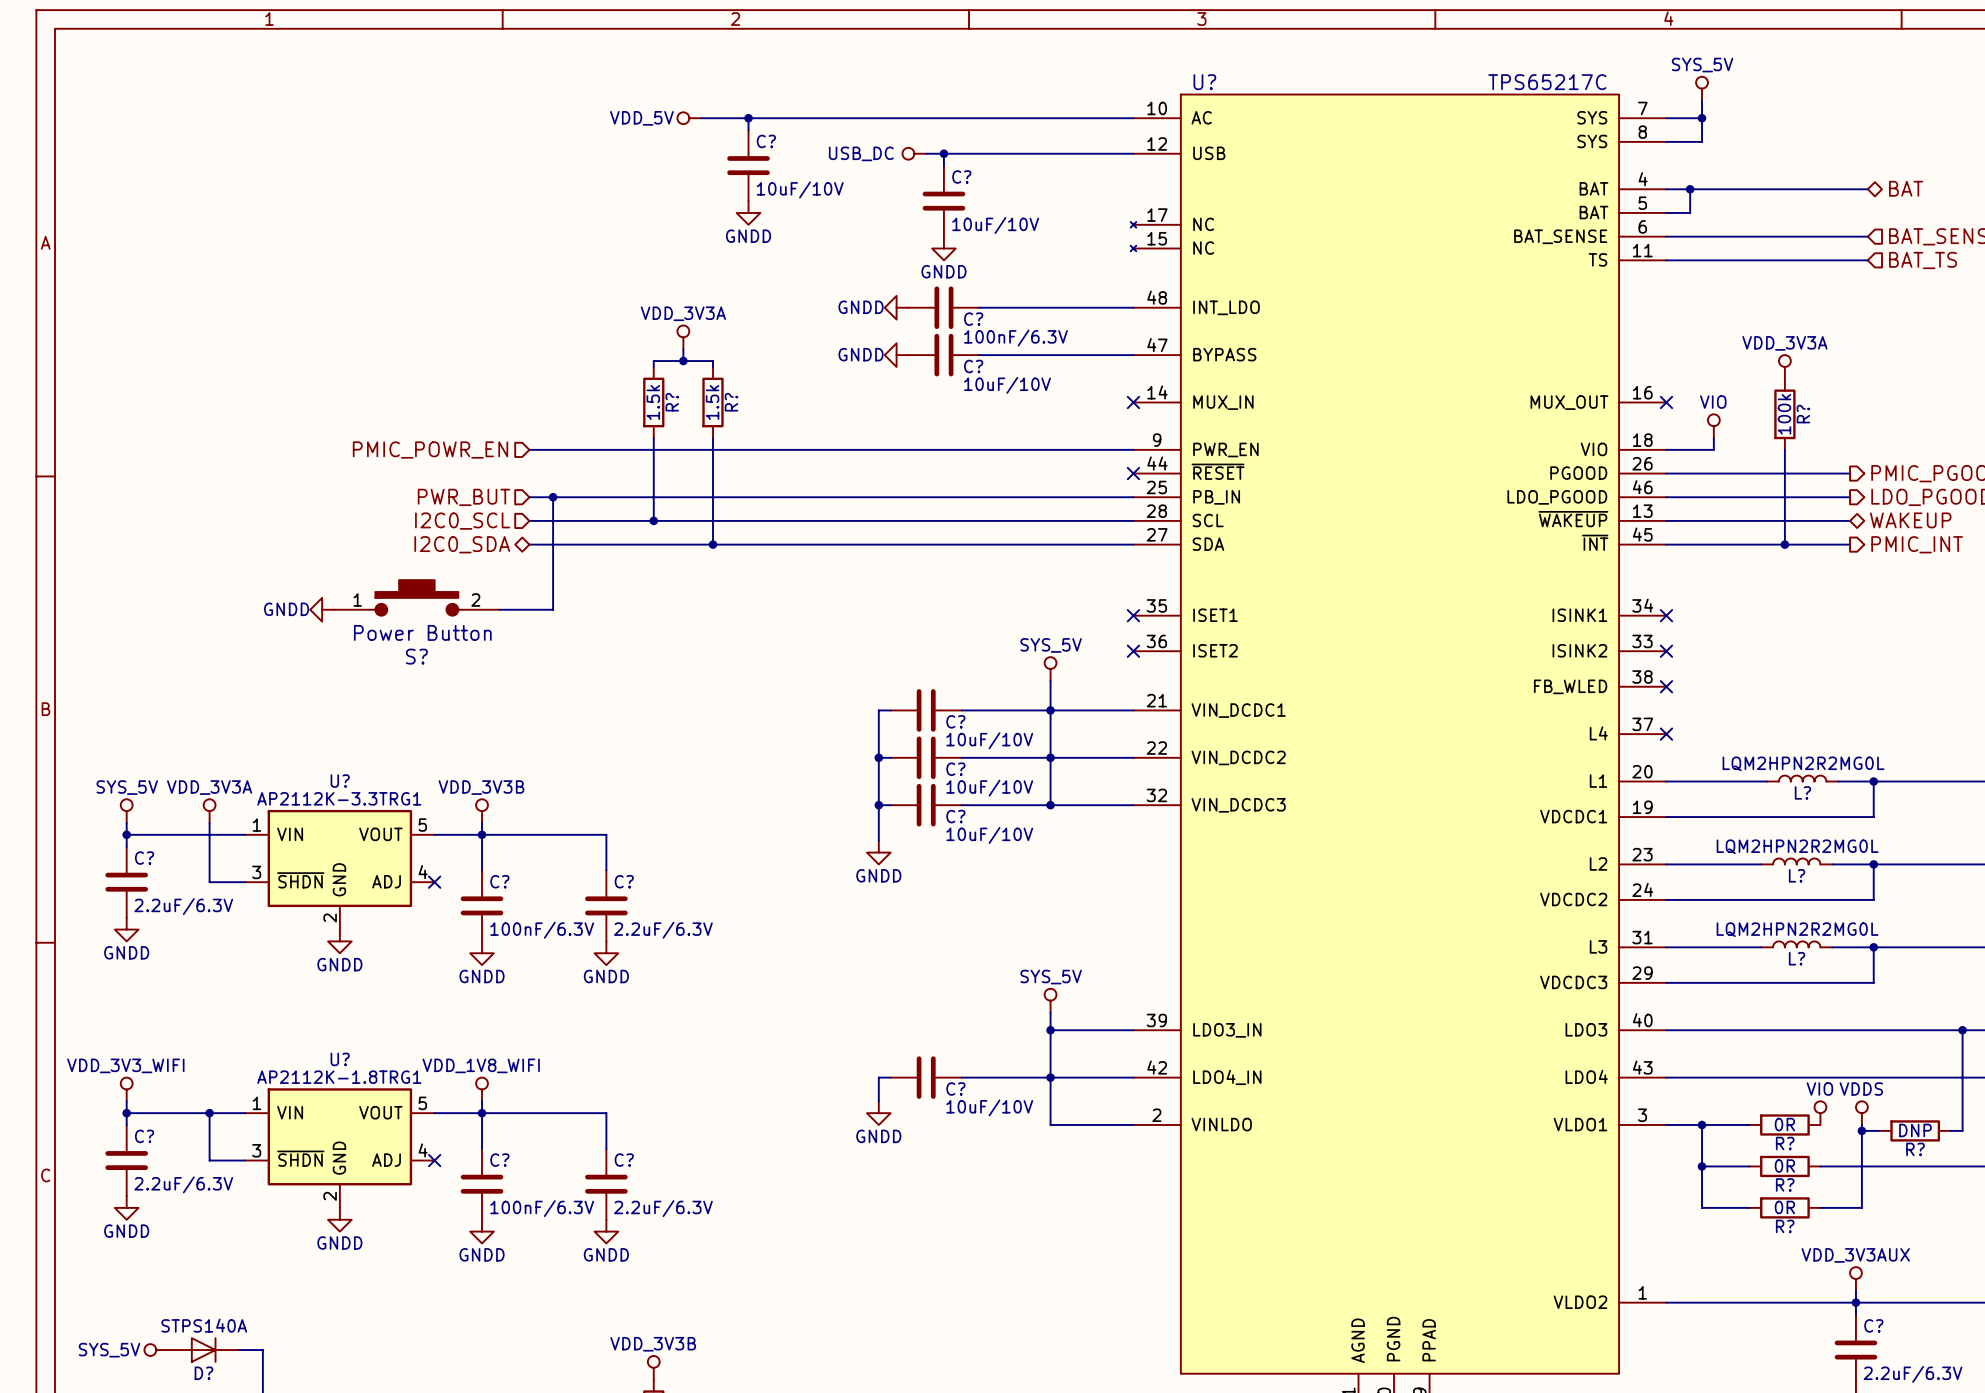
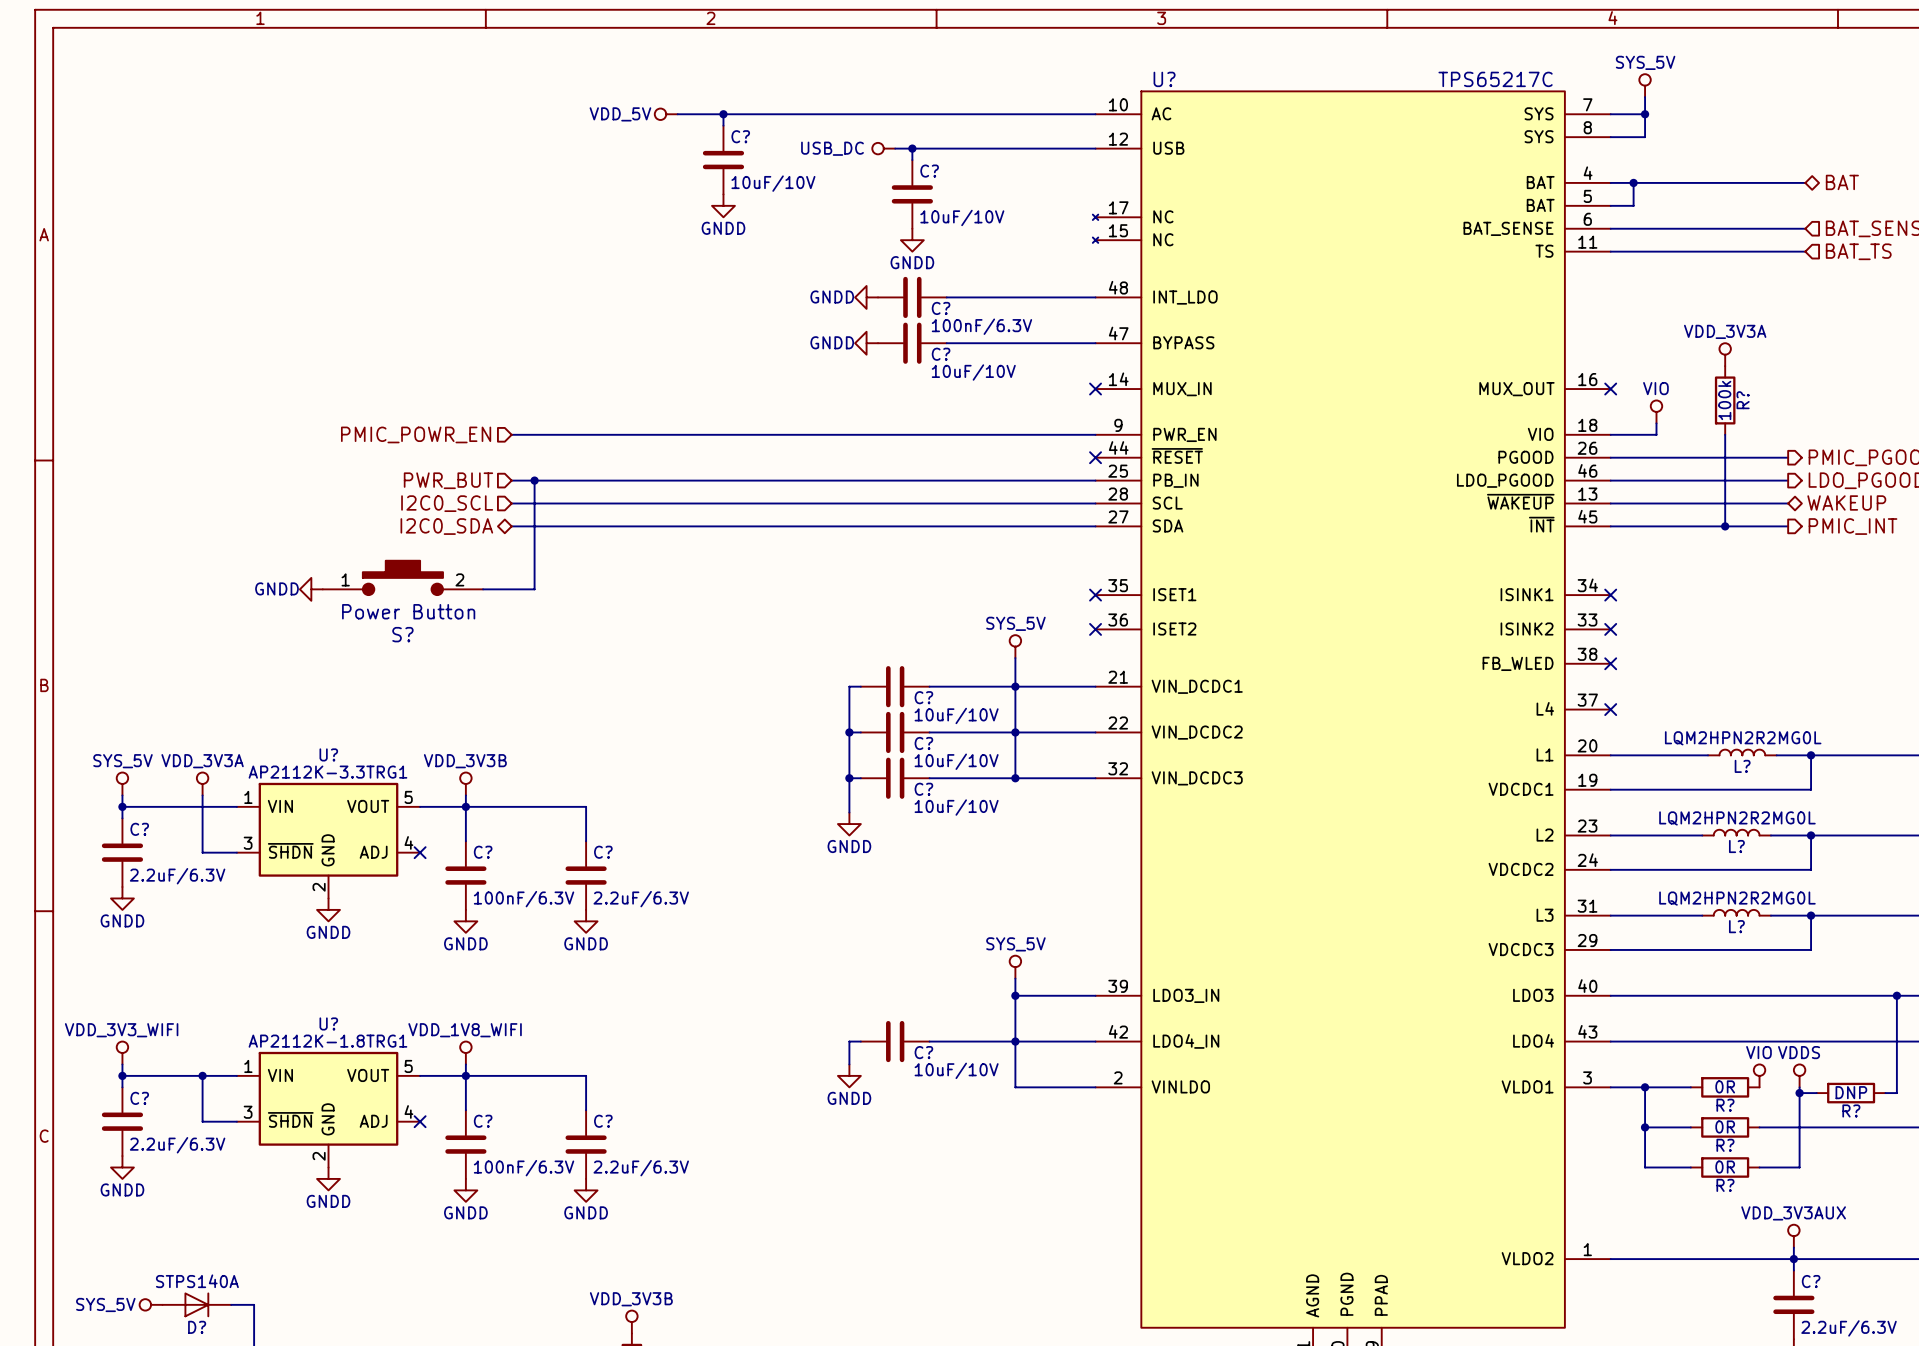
power symbol: VDD_3V3A (683, 337) -> none
wire: (683, 349) (683, 361) -> none
junction: (683, 361) -> none
wire: (653, 366) (653, 361) (712, 361) (712, 366) -> none
R?: 1.5k (653, 402) -> none
R?: 1.5k (712, 402) -> none
wire: (653, 438) (653, 520) -> none
wire: (712, 438) (712, 544) -> none
junction: (653, 520) -> none
junction: (712, 544) -> none

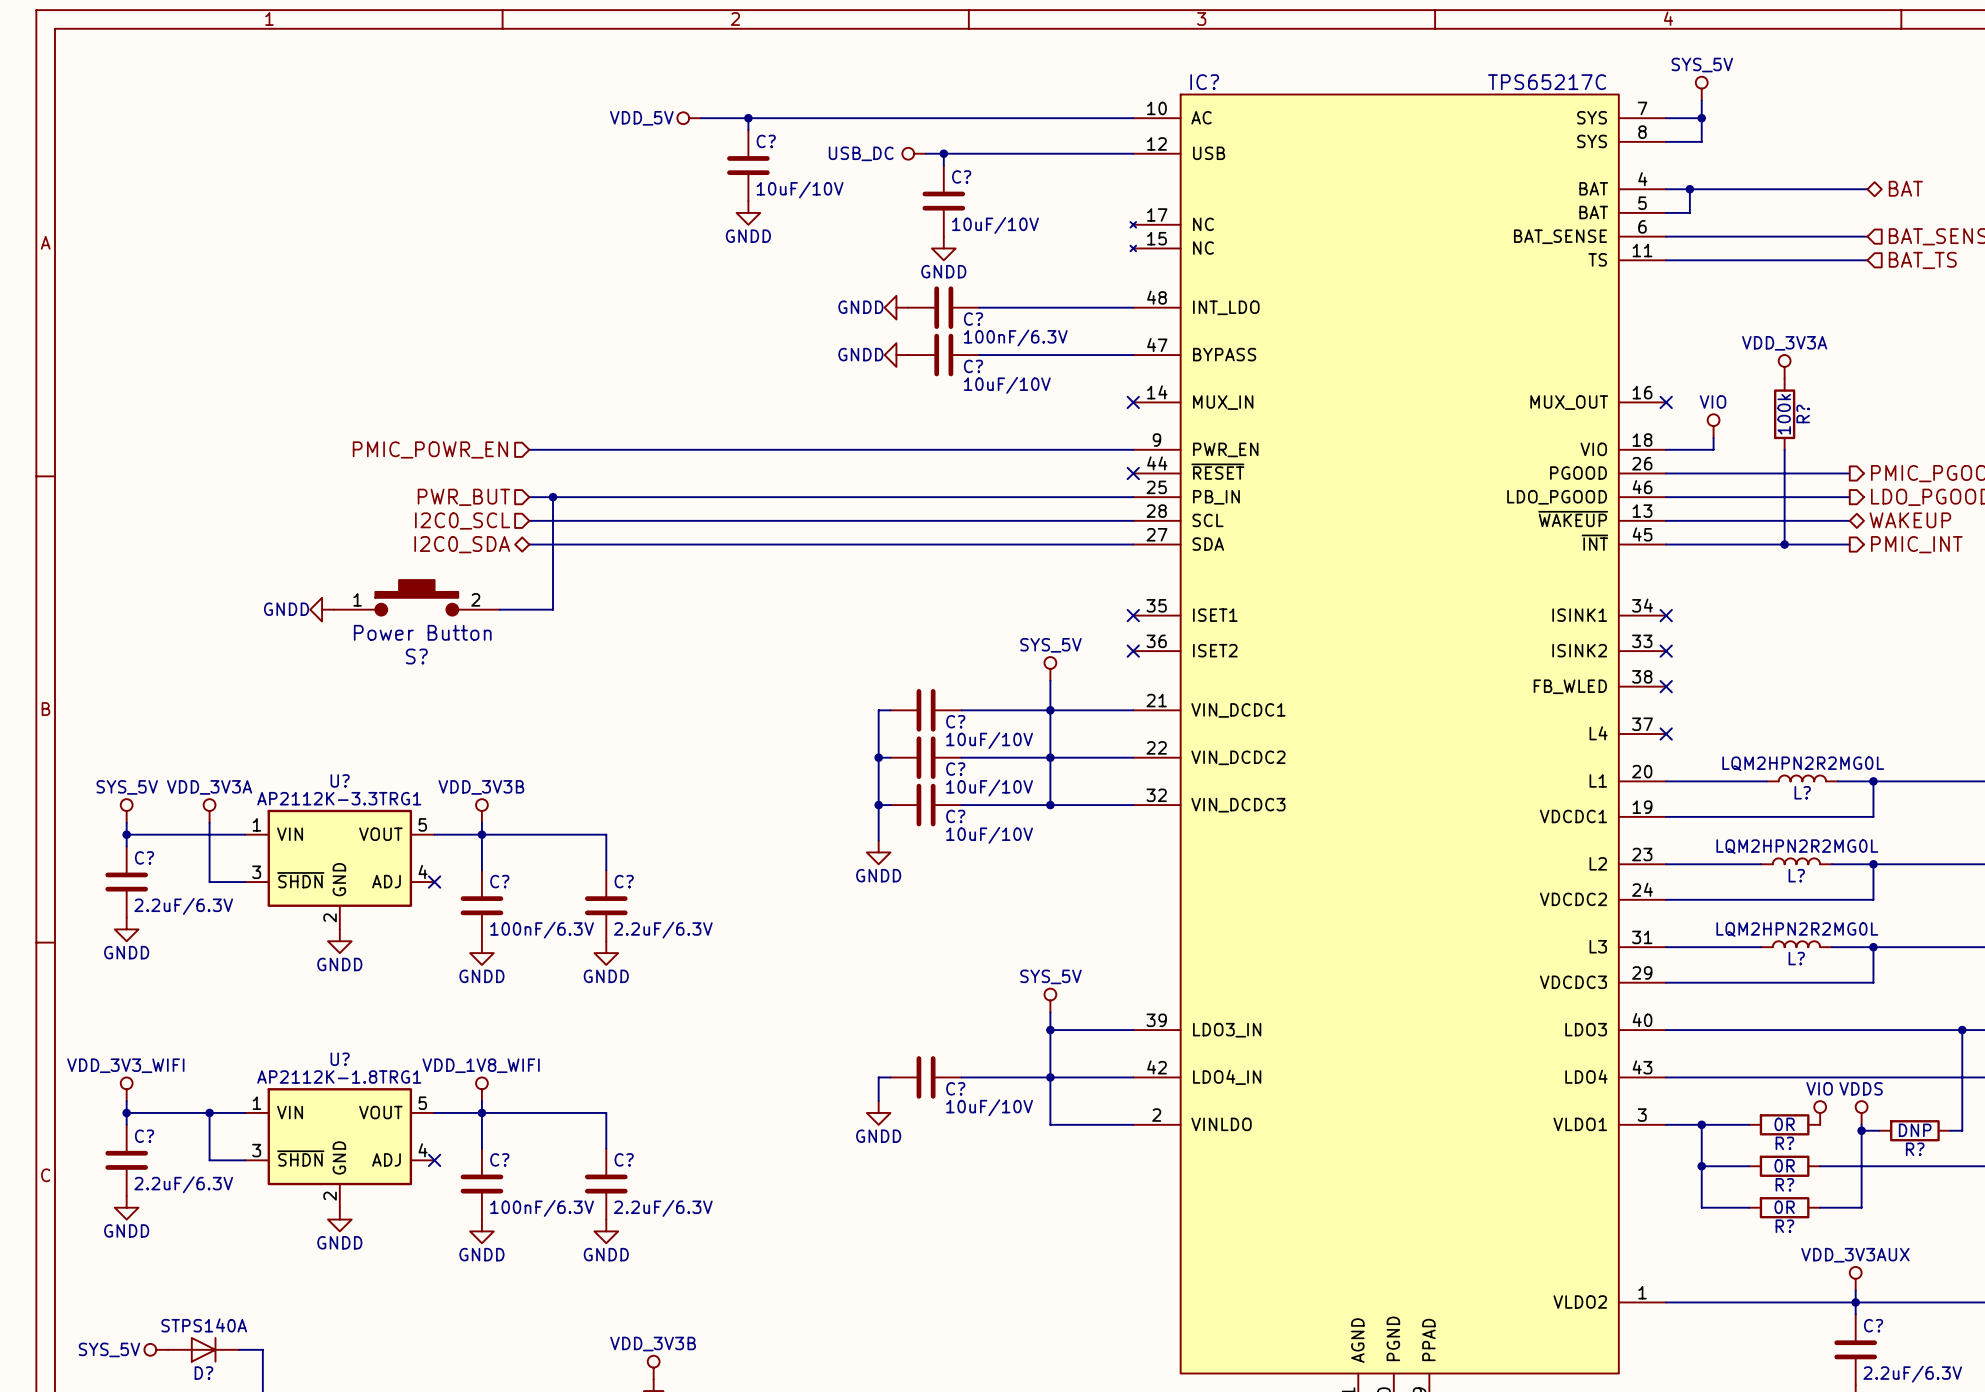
U? name: U? (1164, 79) -> IC? (1204, 82)

